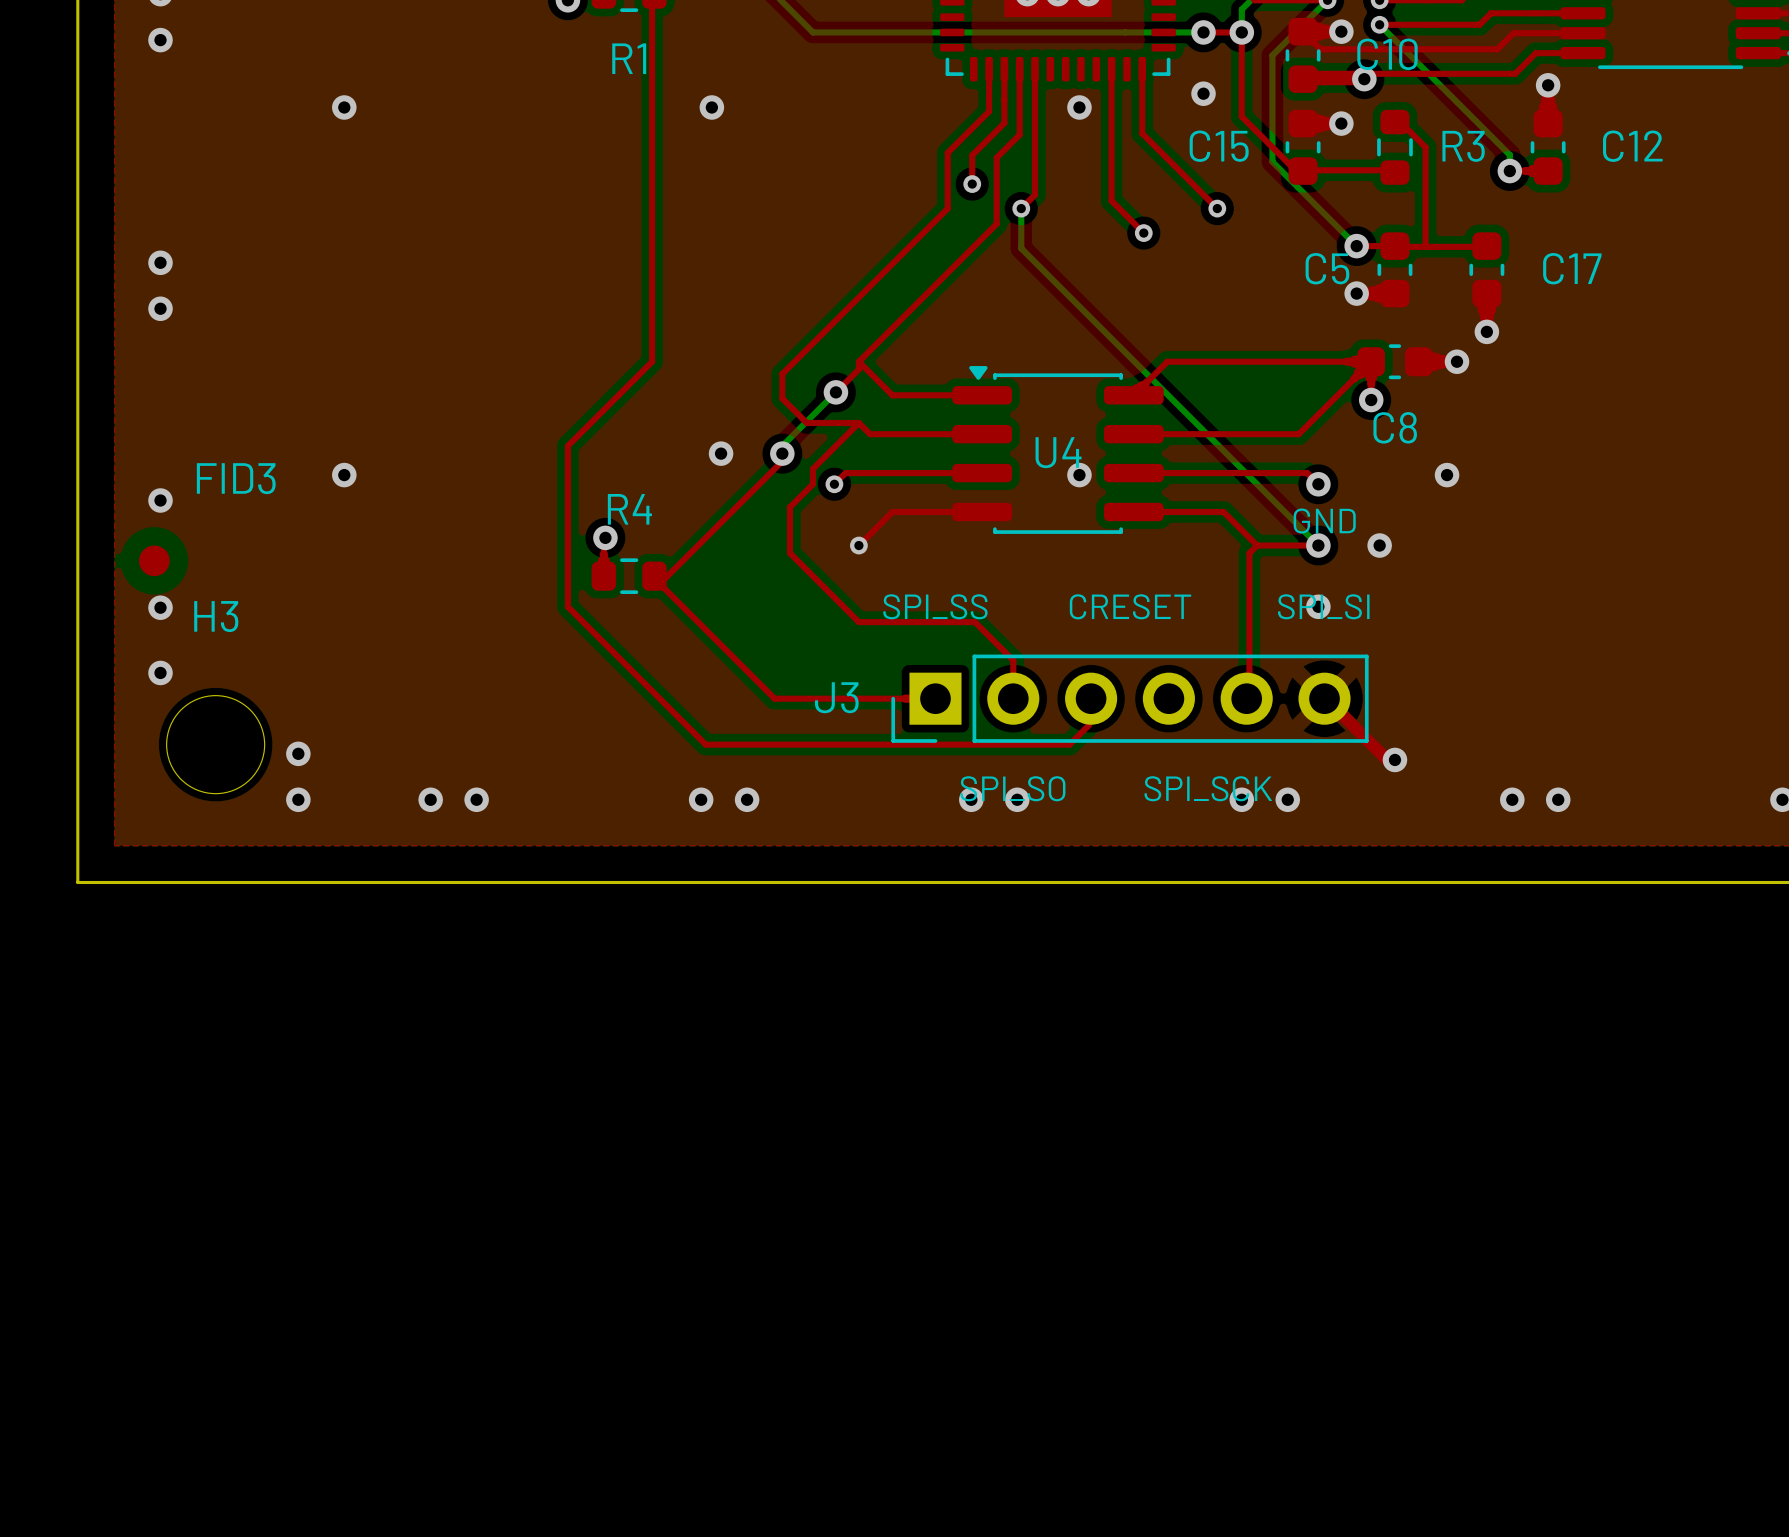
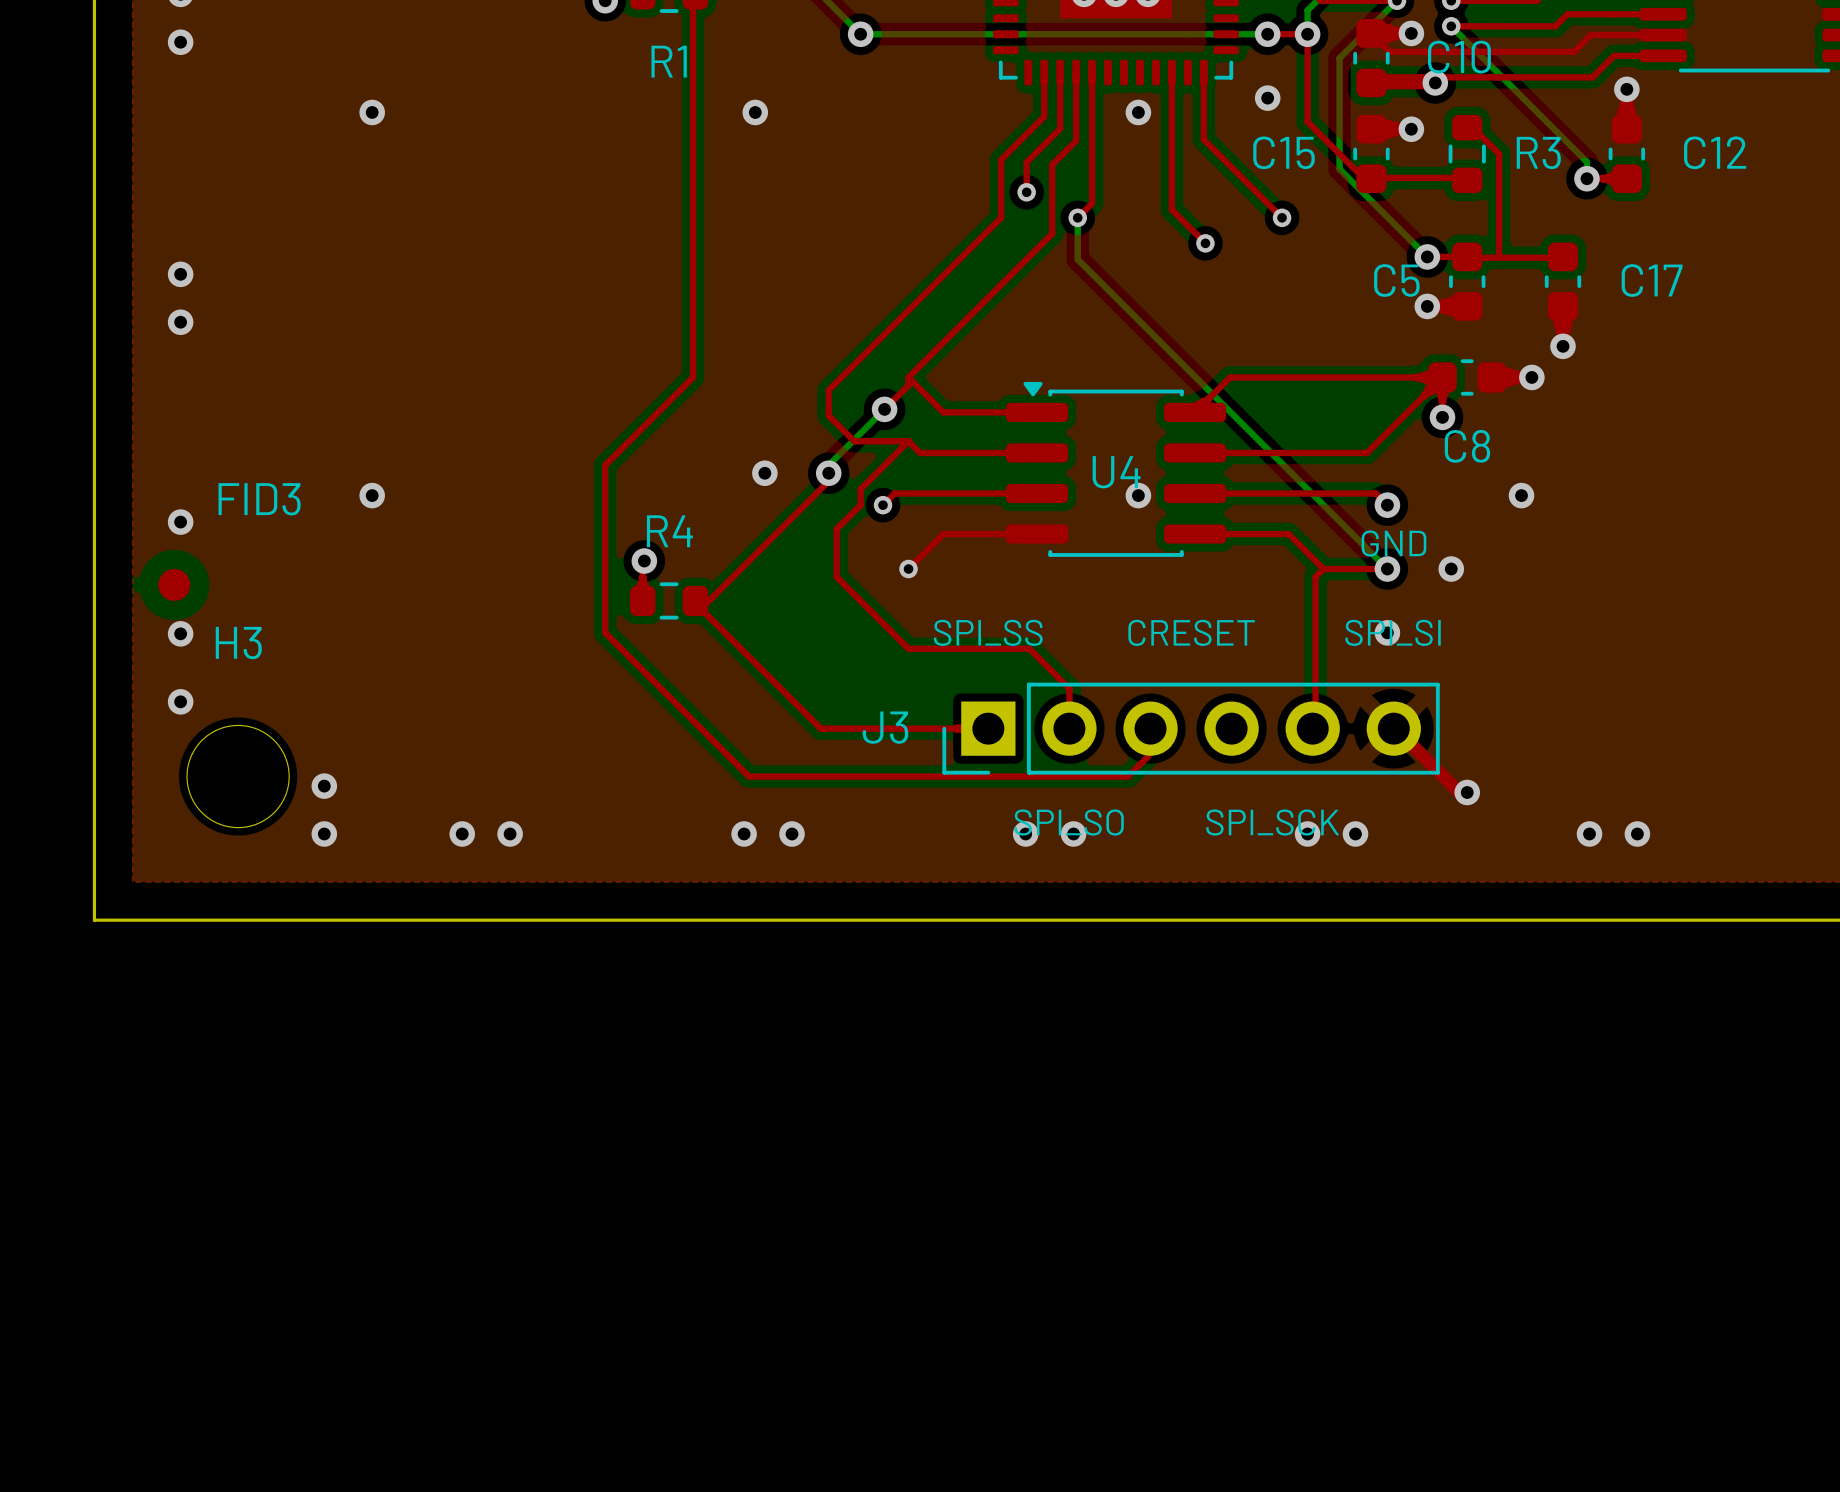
via: none -> (860, 34)

